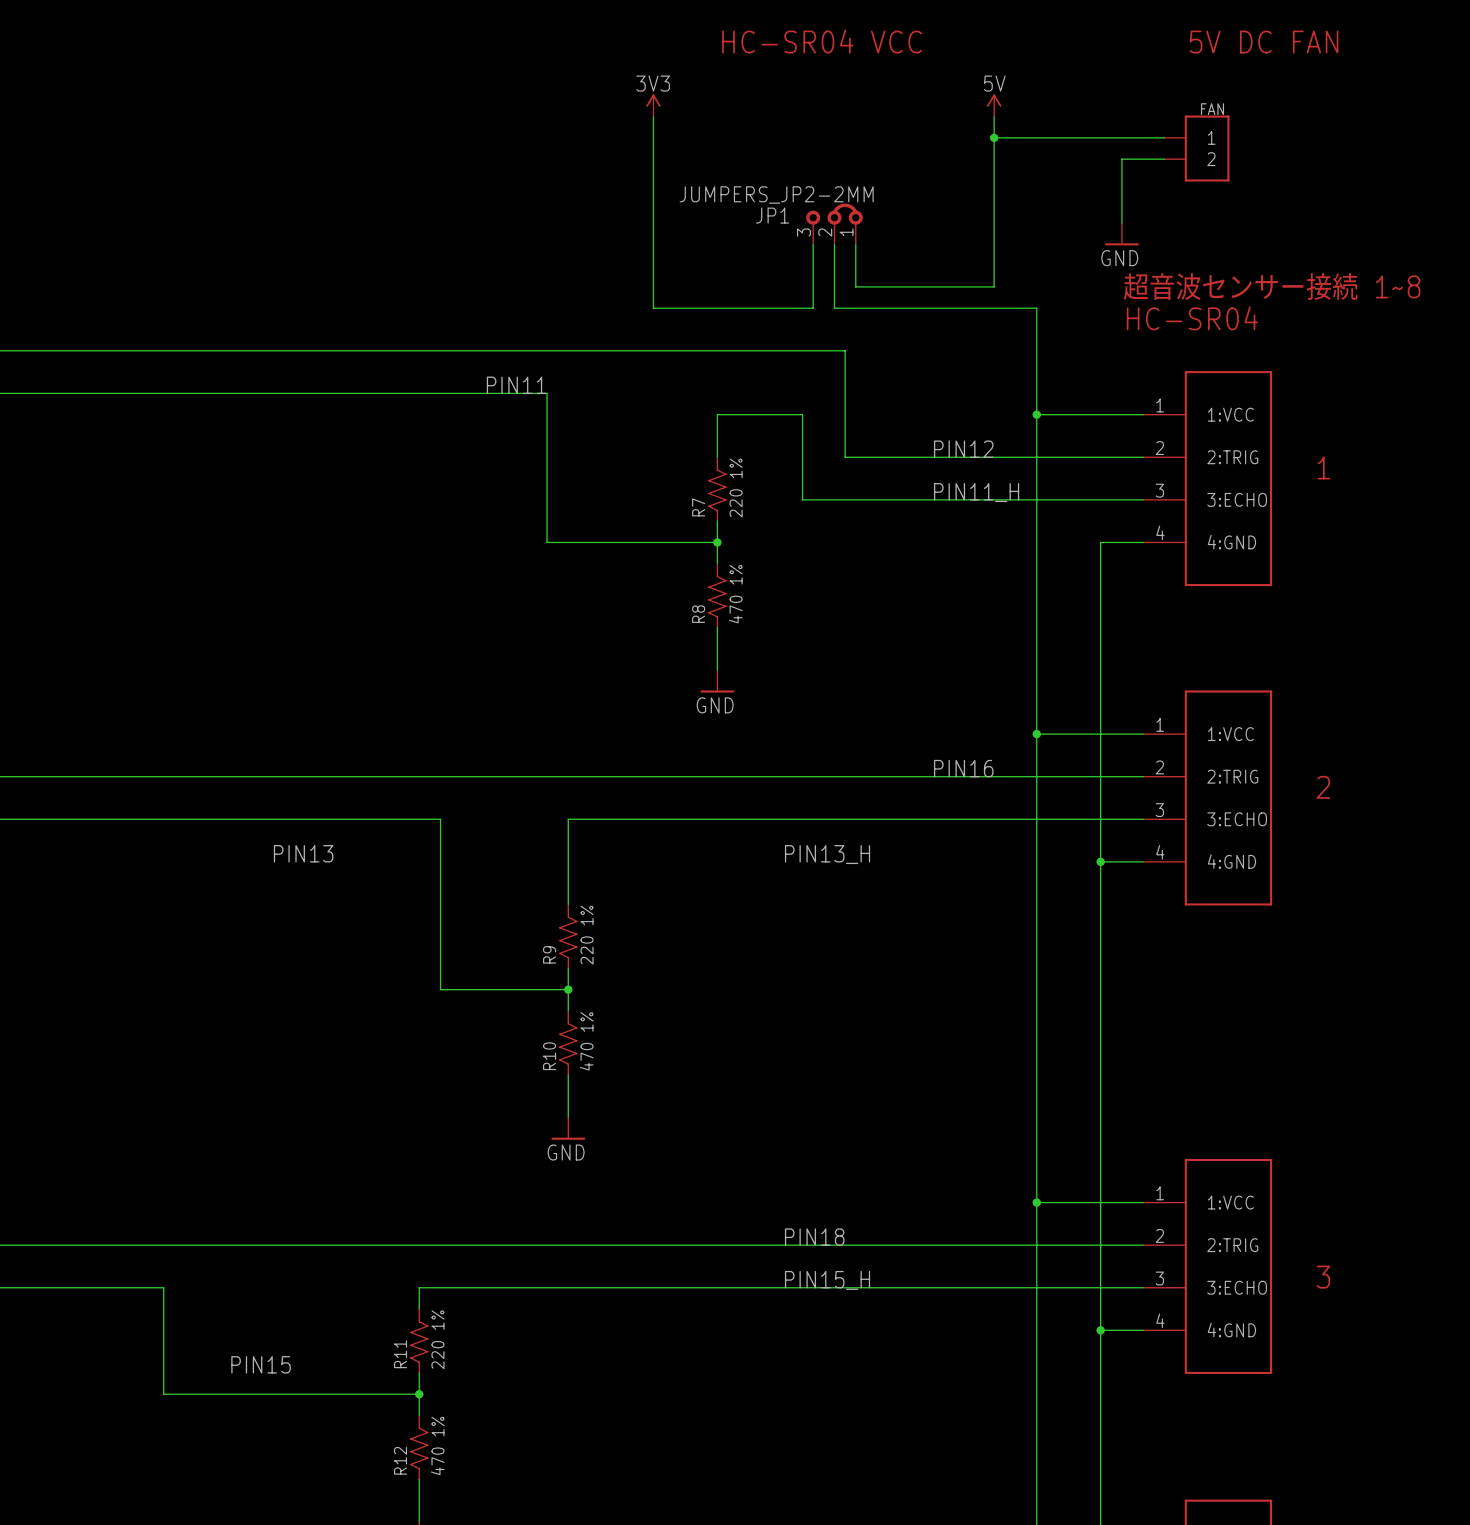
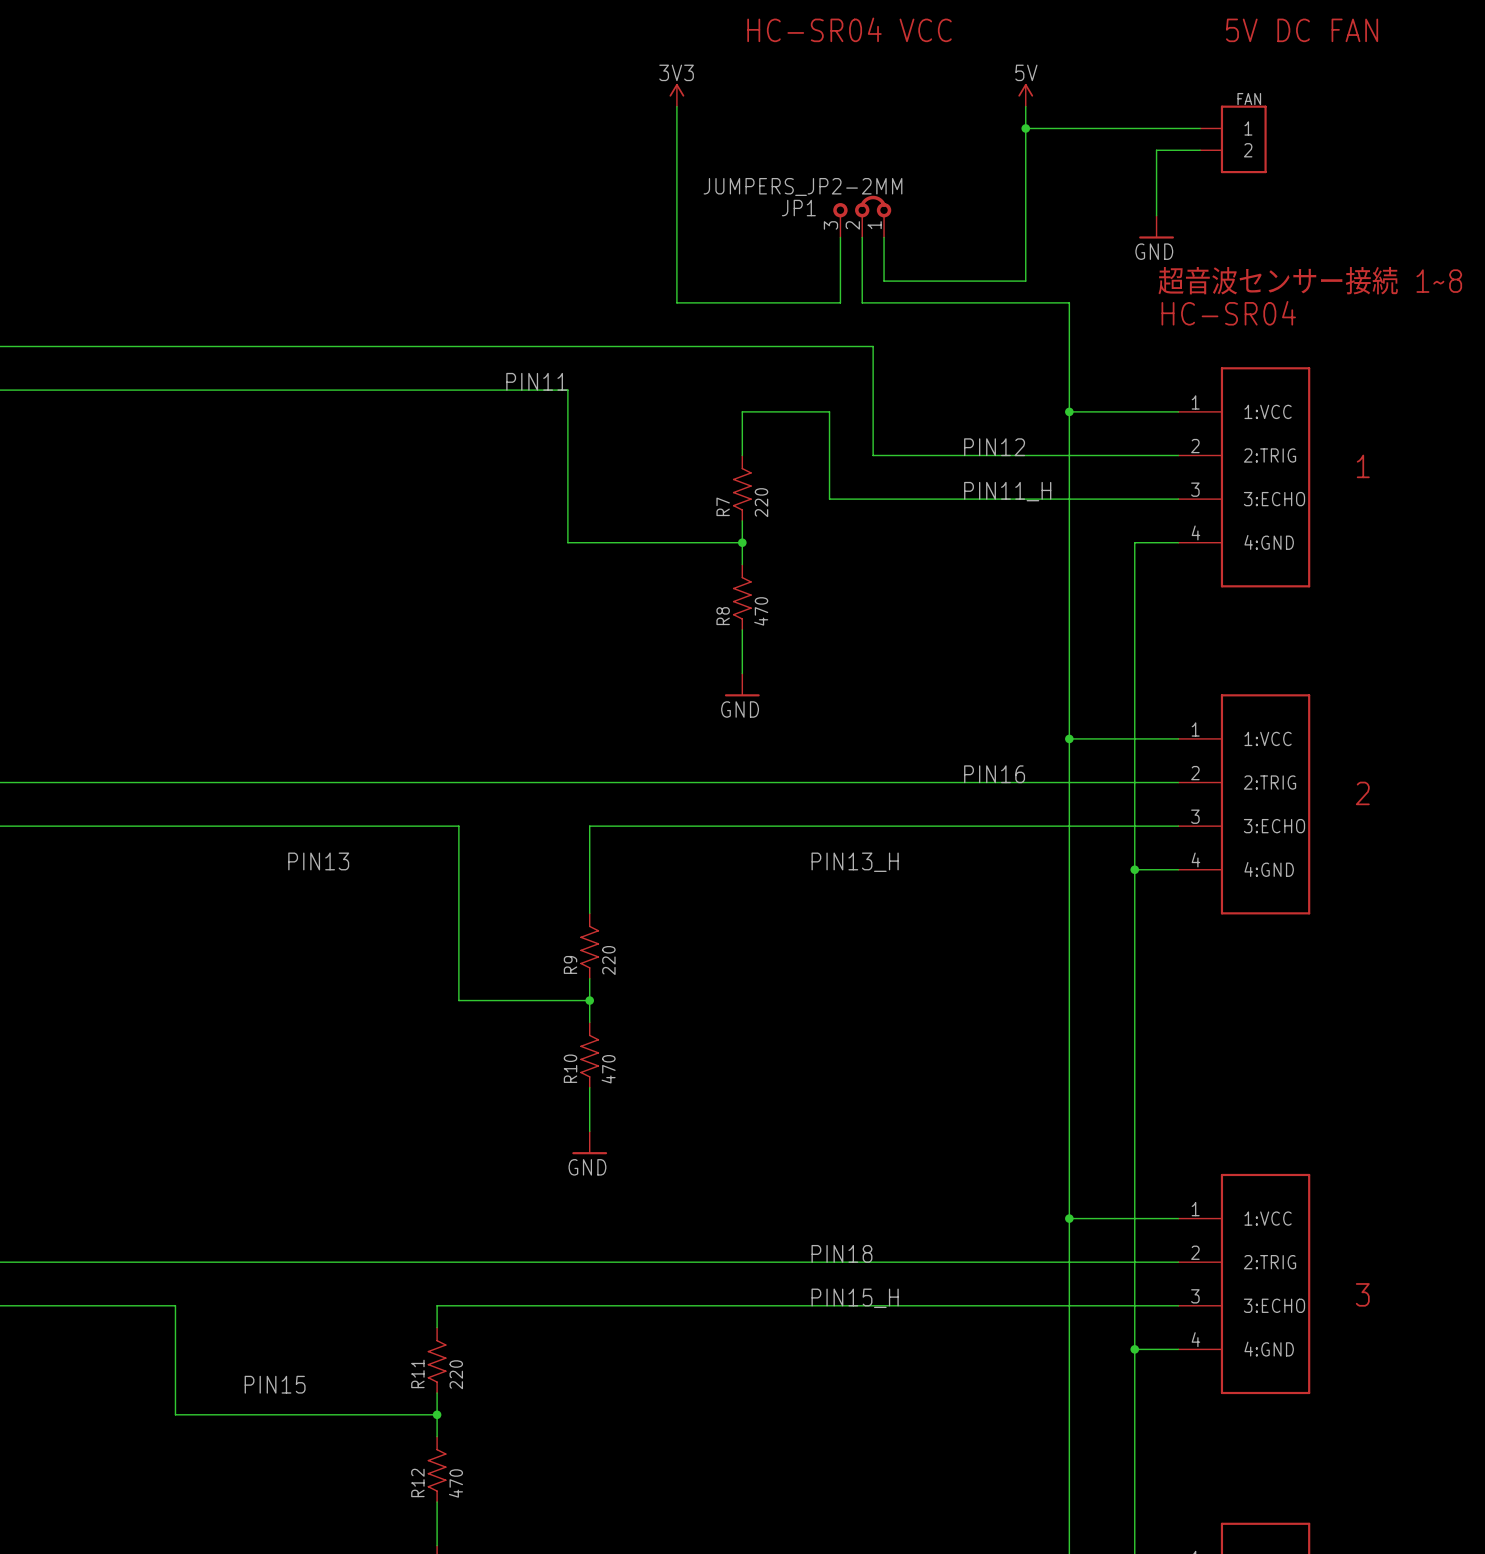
R7 value: 220 1% (736, 488) -> 220 (761, 502)
R8 value: 470 1% (735, 594) -> 470 (761, 611)
R9 value: 220 1% (587, 935) -> 220 (608, 960)
R10 value: 470 1% (586, 1041) -> 470 (608, 1069)
R11 value: 220 1% (437, 1339) -> 220 (456, 1374)
R12 value: 470 1% (437, 1445) -> 470 (455, 1483)

